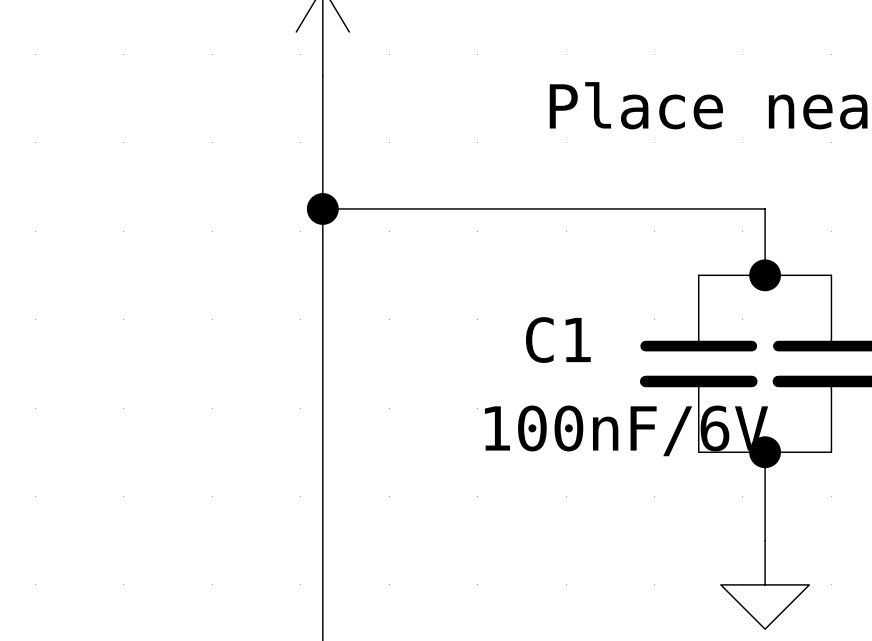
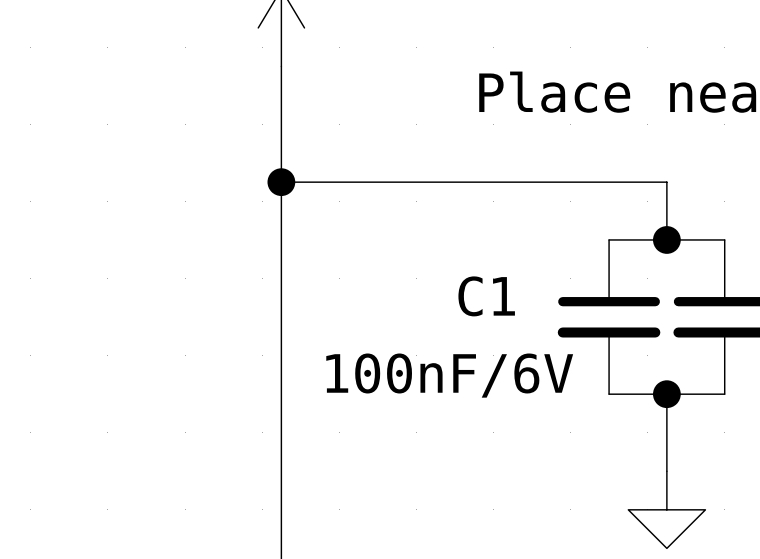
C1 value position: 100nF/6V (626, 430) -> 100nF/6V (449, 375)

